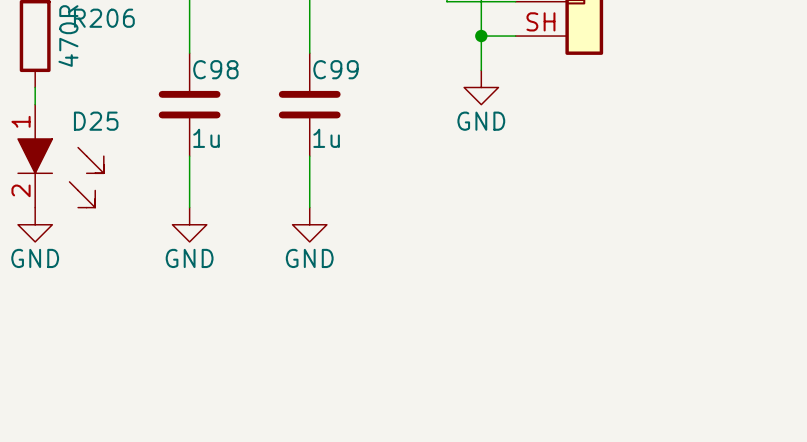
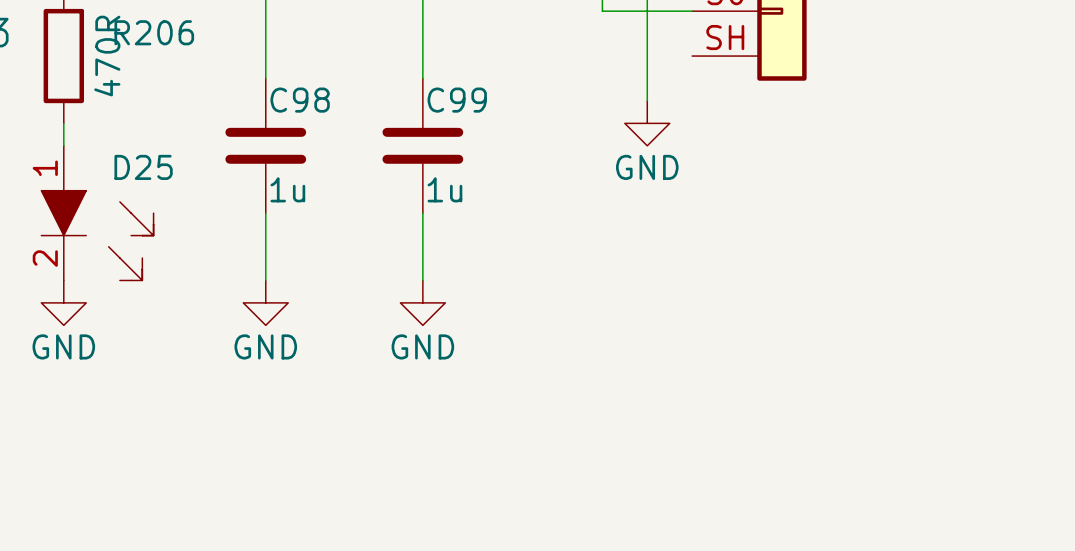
wire: (481, 36) (515, 36) -> none
junction: (481, 36) -> none

